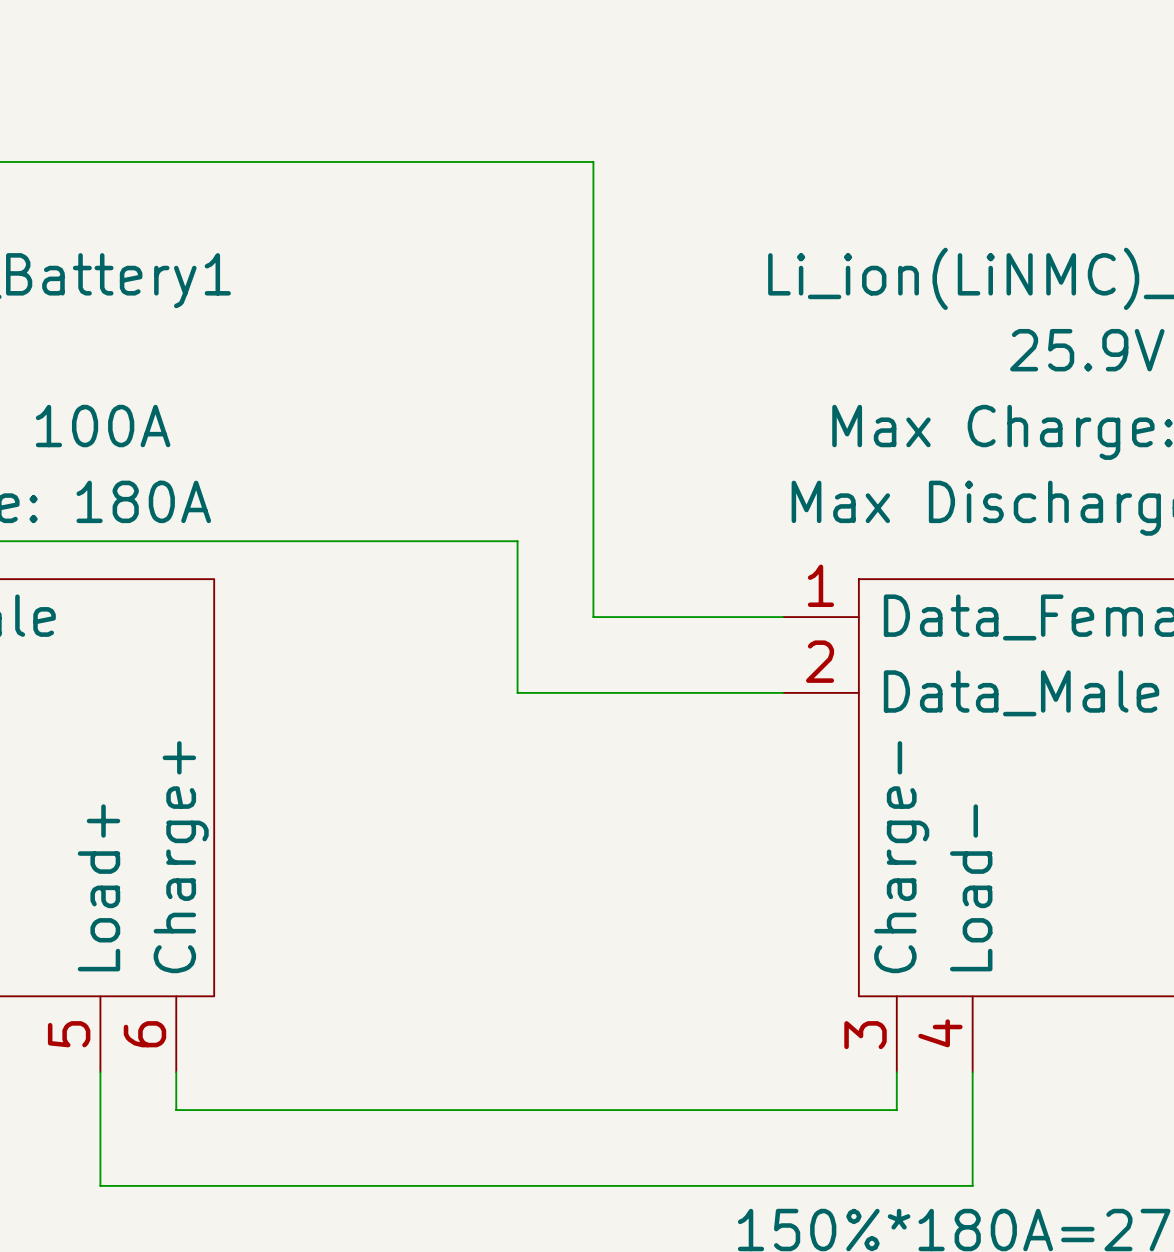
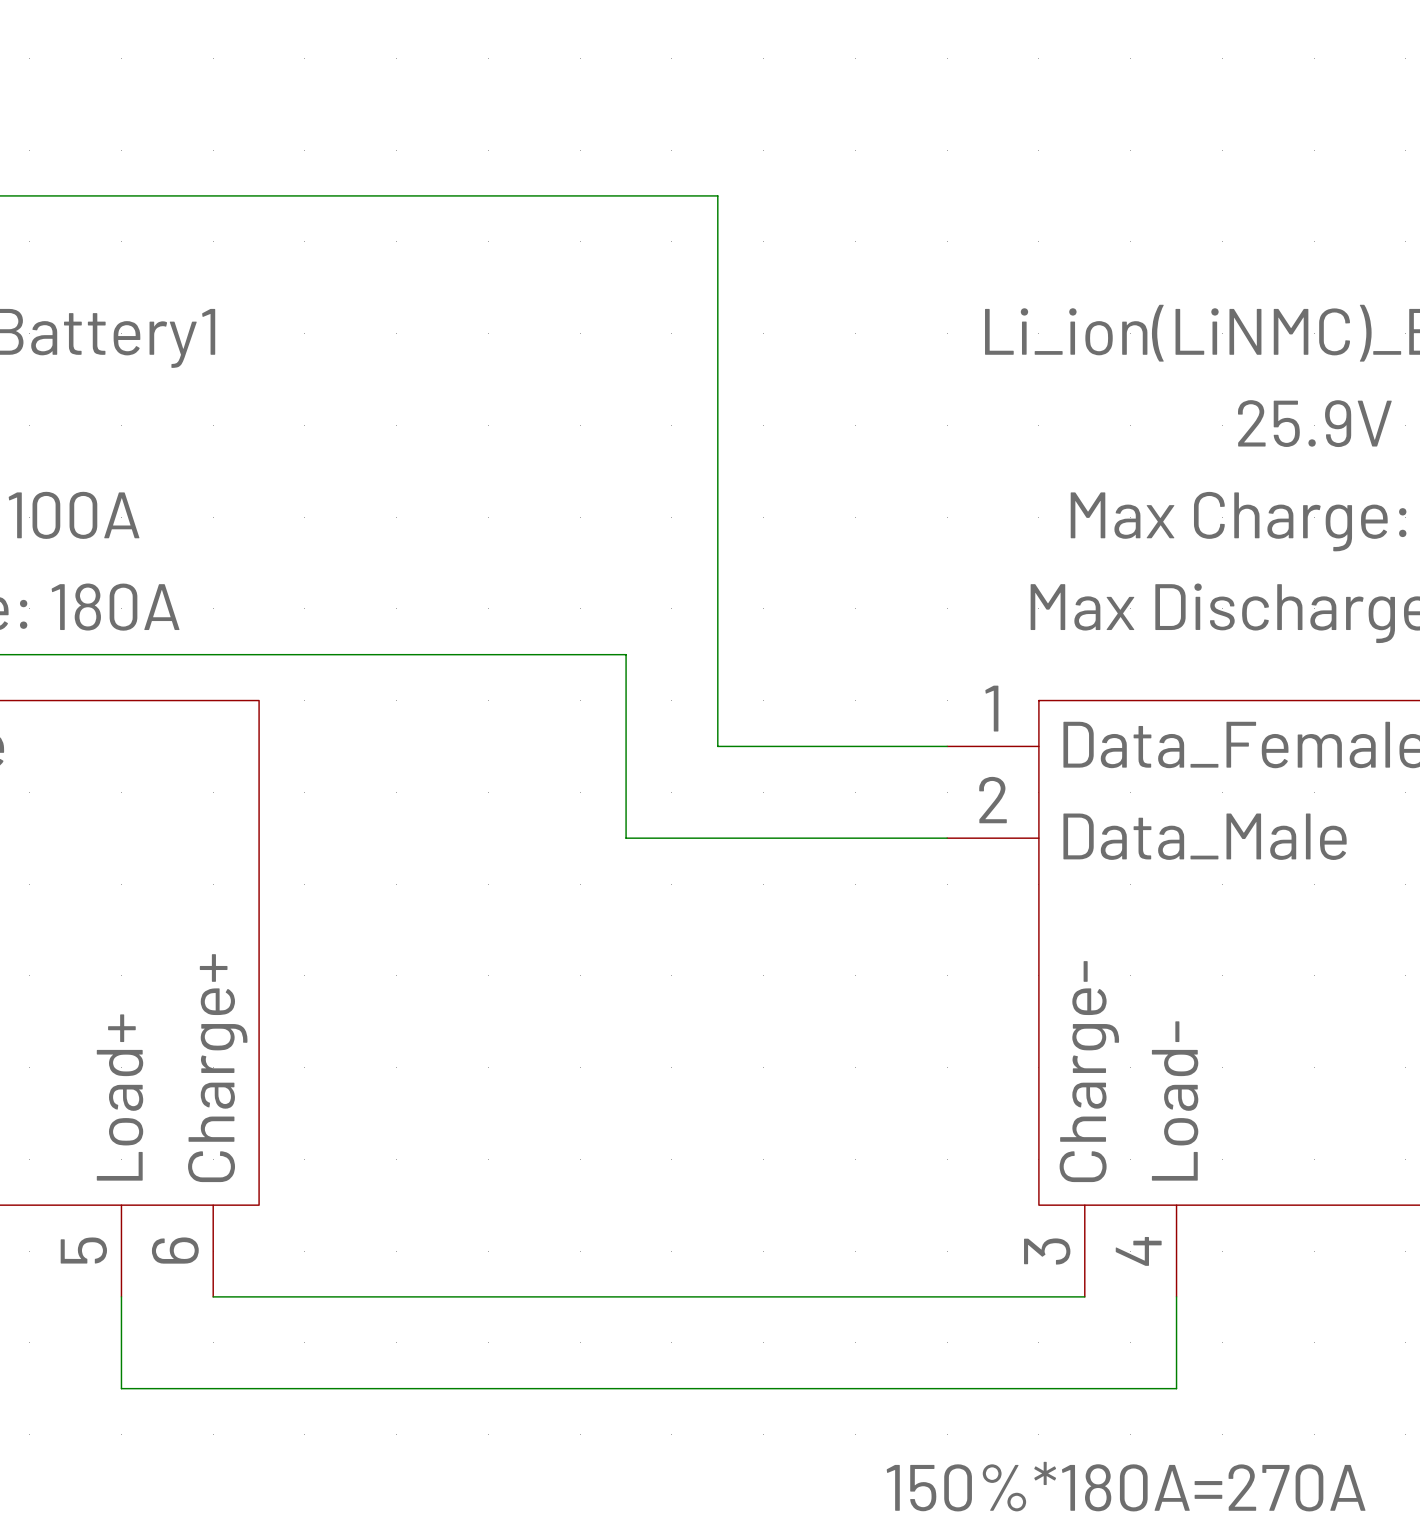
wire: (176, 1072) (176, 1110) (896, 1110) (896, 1072) -> (213, 1296) (1084, 1296)
wire: (100, 1148) (100, 1185) (972, 1185) (972, 1148) -> (121, 1388) (1176, 1388)

